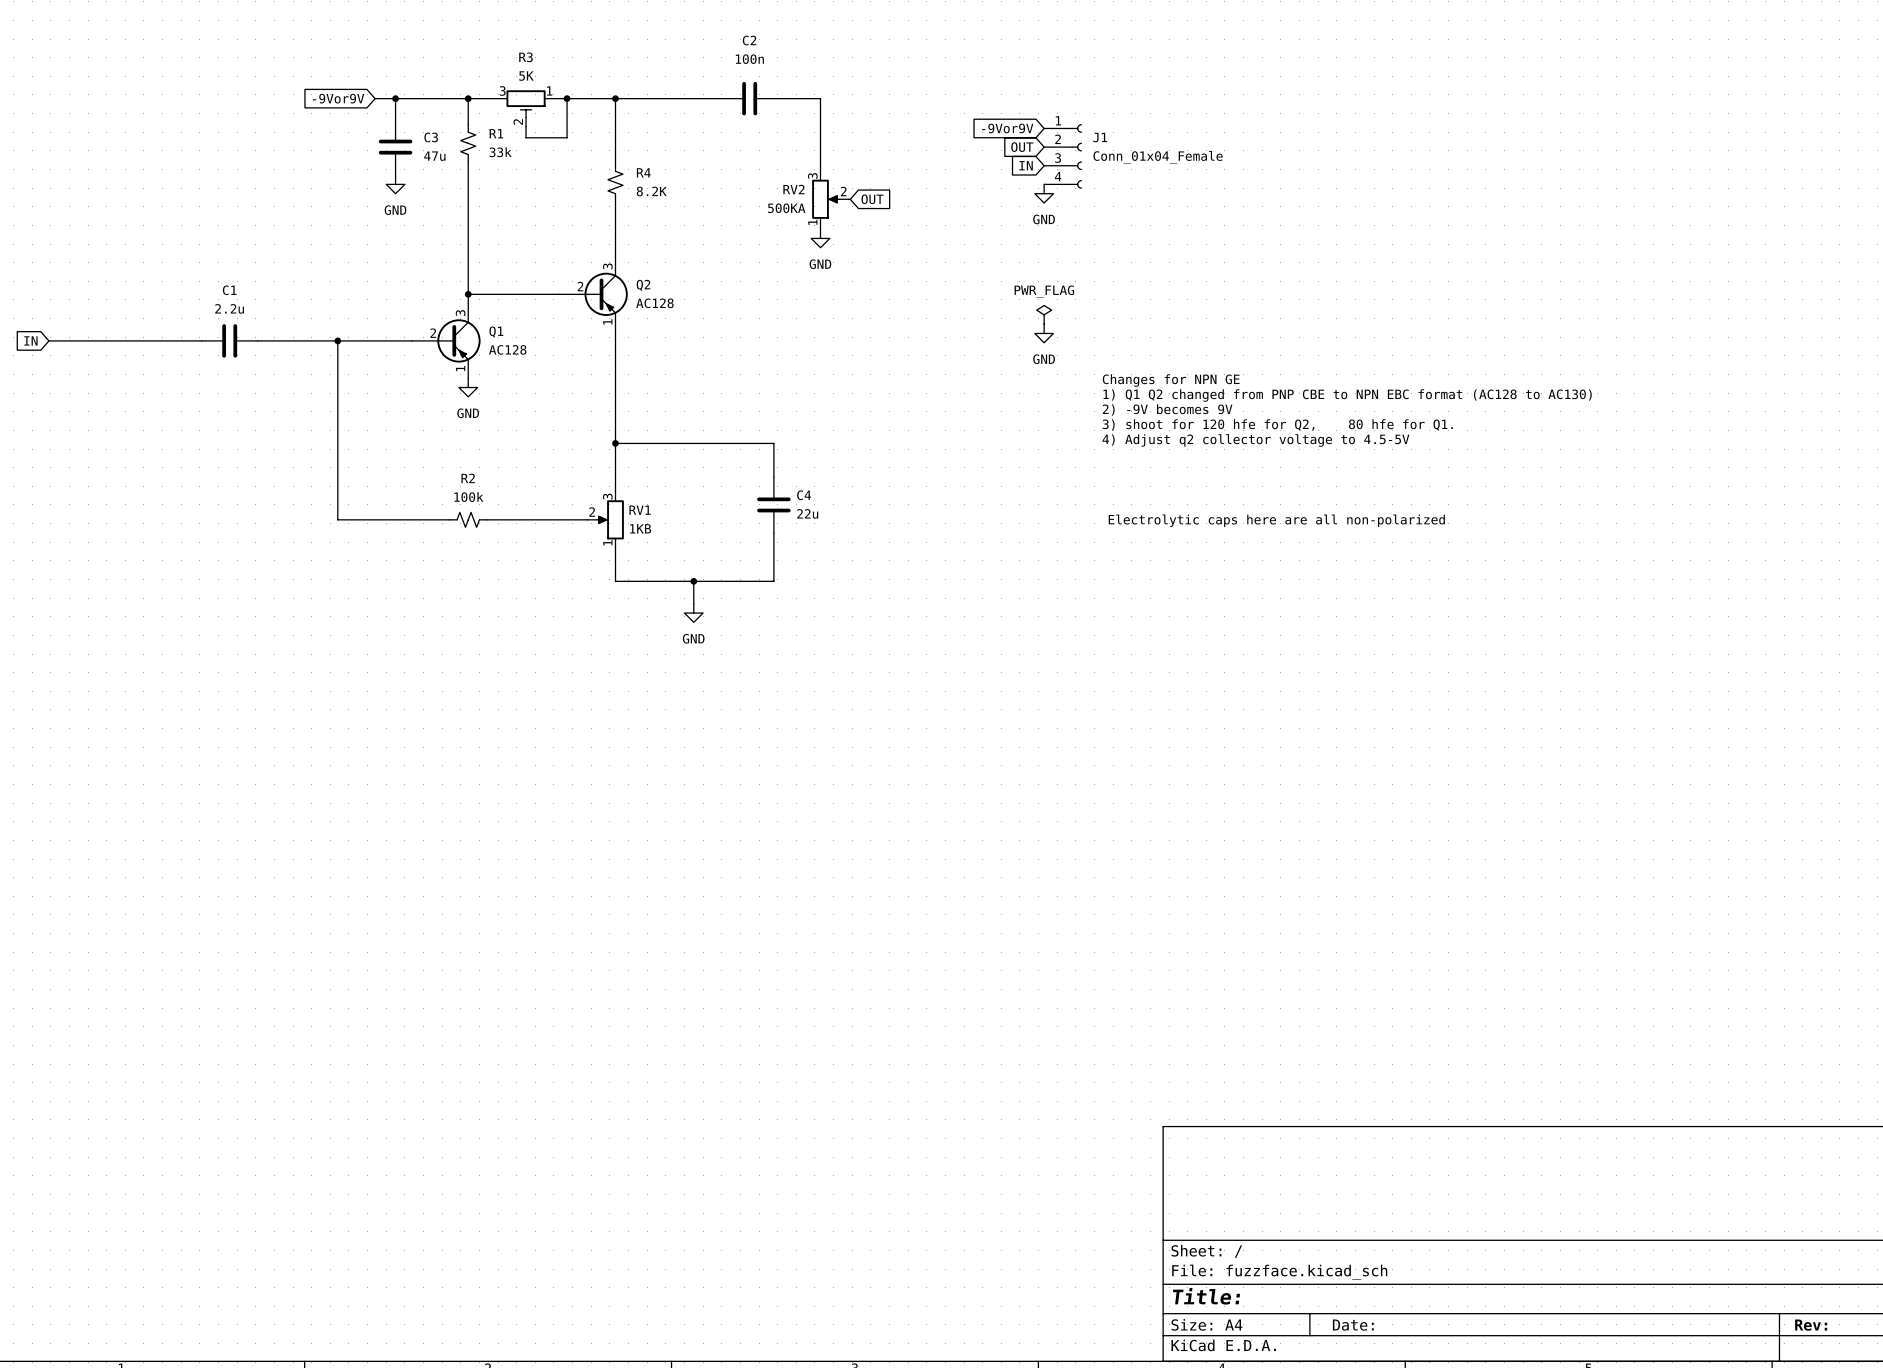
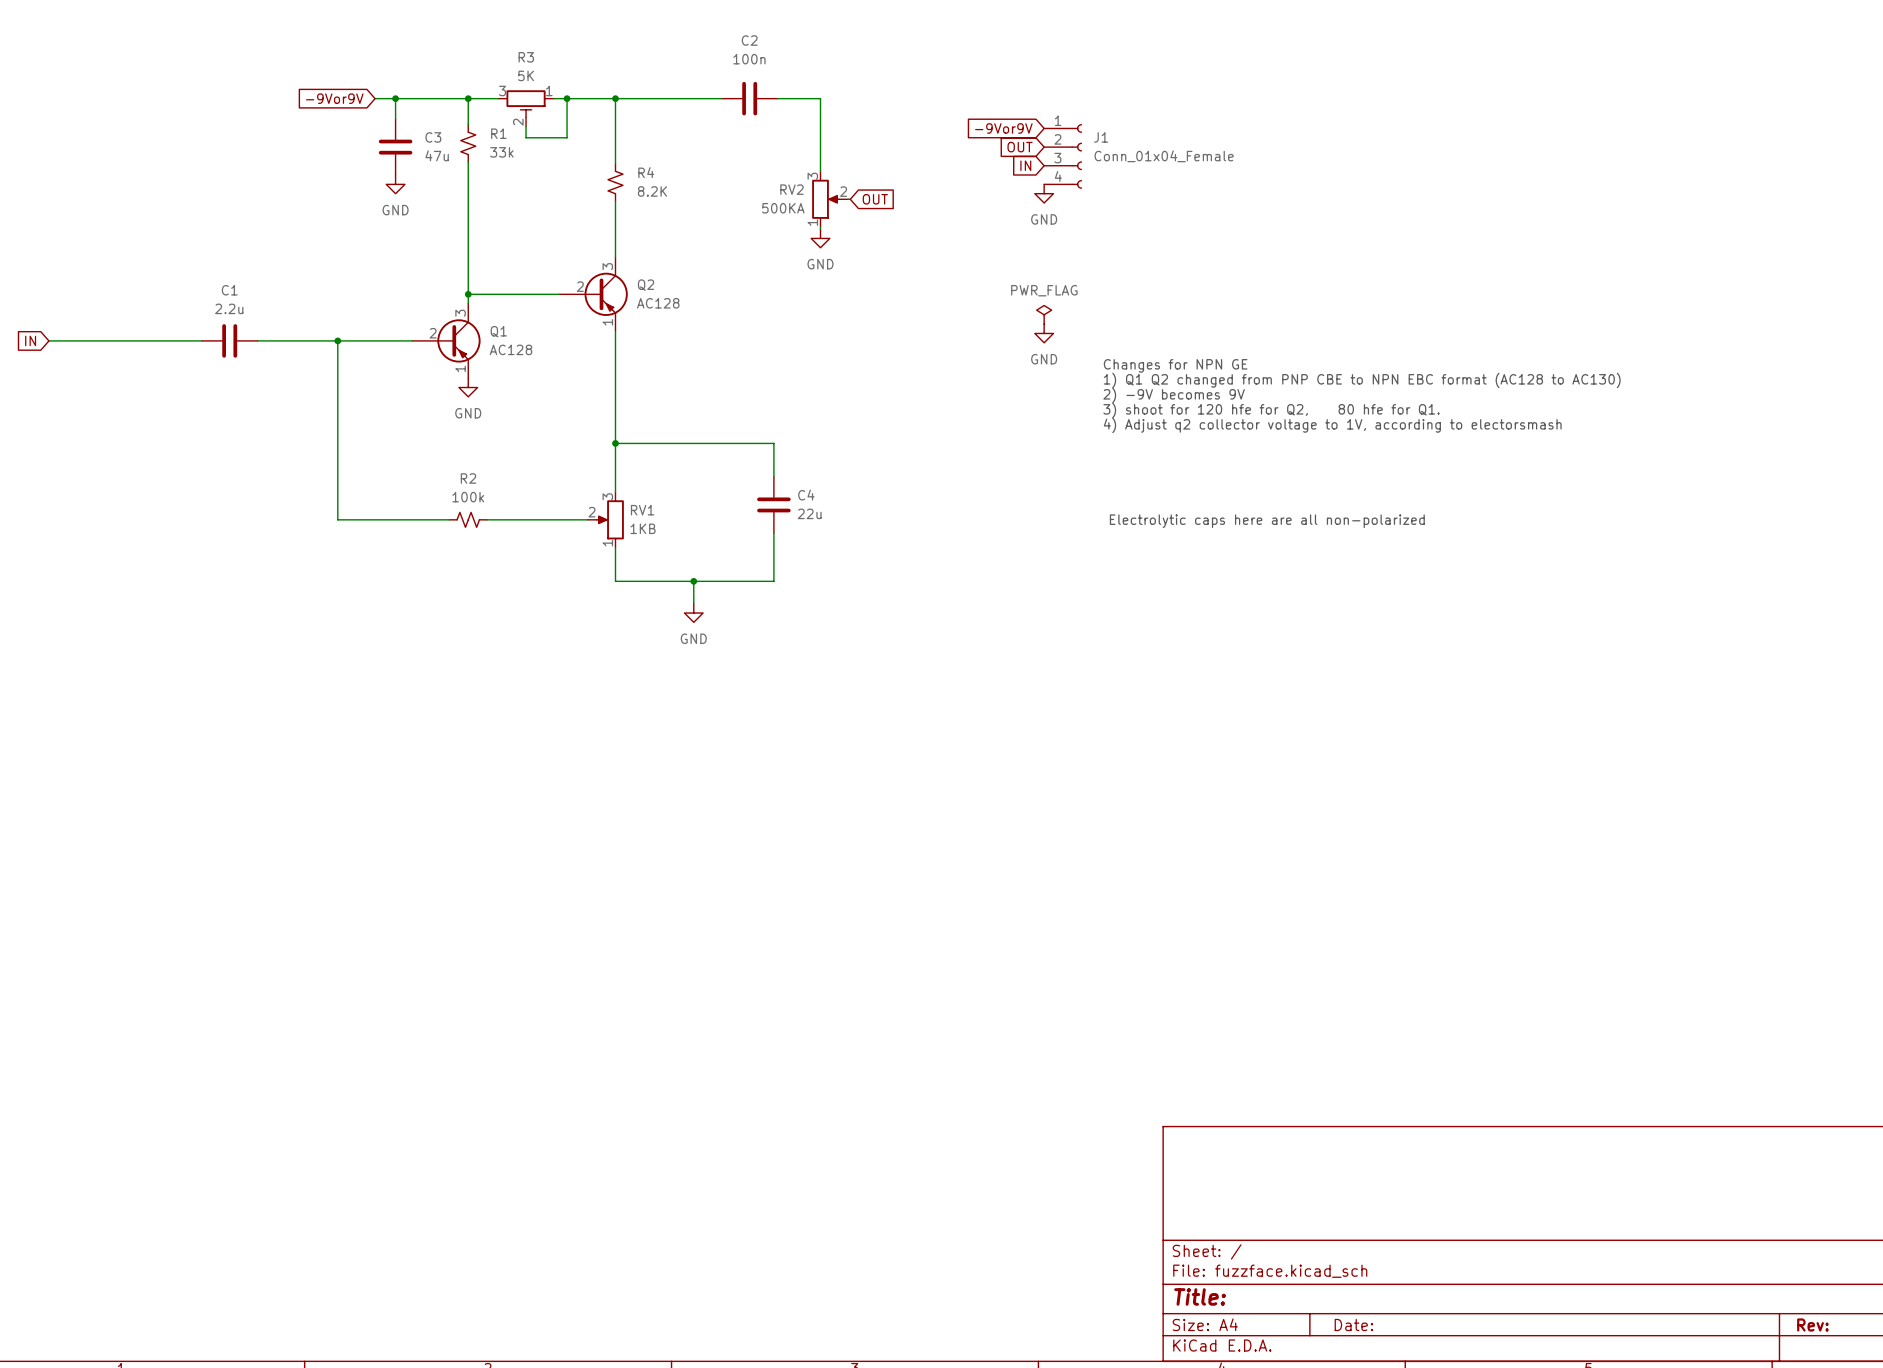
text: none -> Changes for NPN GE (1175, 365)
text: Changes for NPN GE (1171, 380) -> 1) Q1 Q2 changed from PNP CBE to NPN EBC format (AC128 to AC130) (1362, 380)
text: 1) Q1 Q2 changed from PNP CBE to NPN EBC format (AC128 to AC130) (1347, 395) -> 2) -9V becomes 9V (1174, 395)
text: 2) -9V becomes 9V (1167, 409) -> 3) shoot for 120 hfe for Q2, 80 hfe for Q1. (1271, 410)
text: 3) shoot for 120 hfe for Q2, 80 hfe for Q1. (1277, 425) -> 4) Adjust q2 collector voltage to 1V, according to electorsmash (1332, 425)
text: 4) Adjust q2 collector voltage to 4.5-5V (1255, 440) -> none

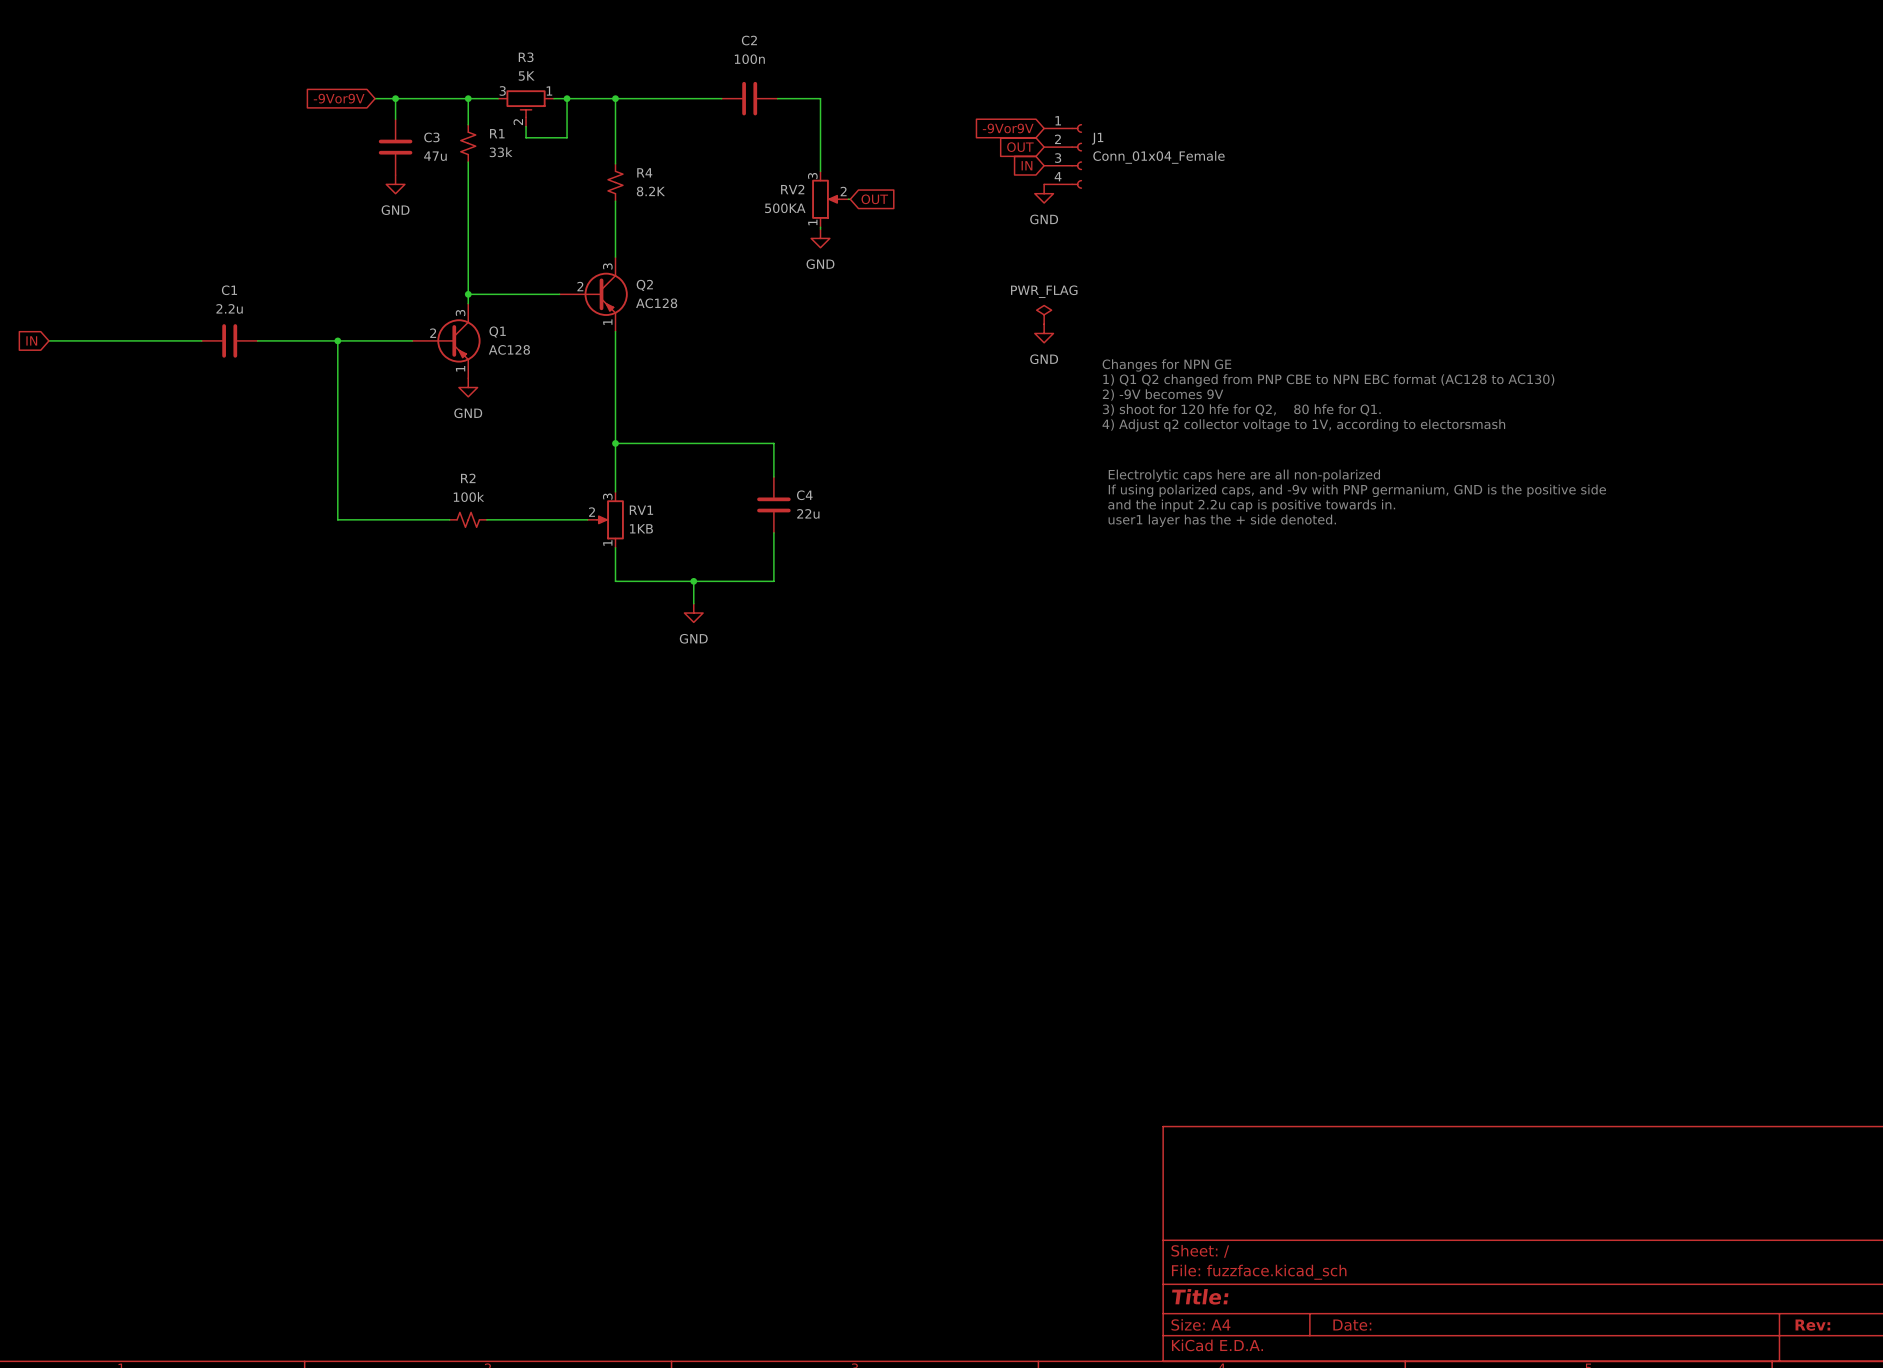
text: none -> Electrolytic caps here are all non-polarized (1244, 475)
text: none -> If using polarized caps, and -9v with PNP germanium, GND is the positive side (1357, 490)
text: none -> and the input 2.2u cap is positive towards in. (1251, 505)
text: Electrolytic caps here are all non-polarized (1267, 521) -> user1 layer has the + side denoted. (1222, 520)

